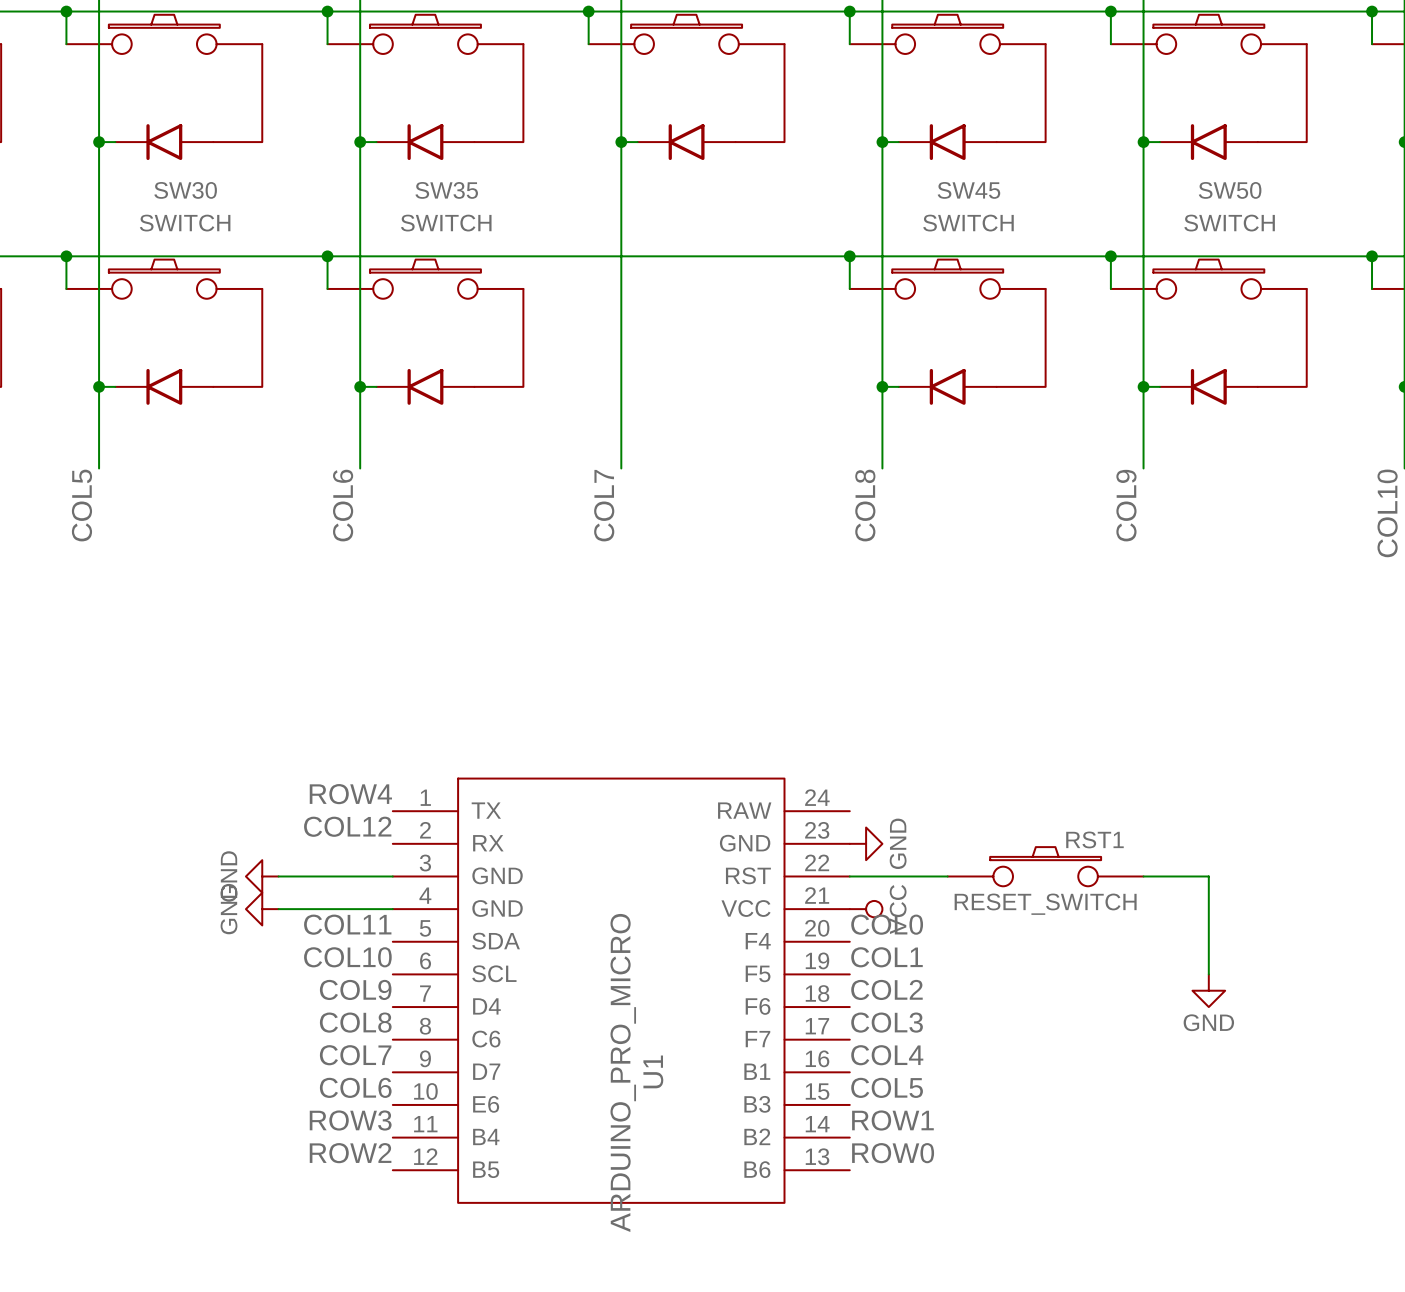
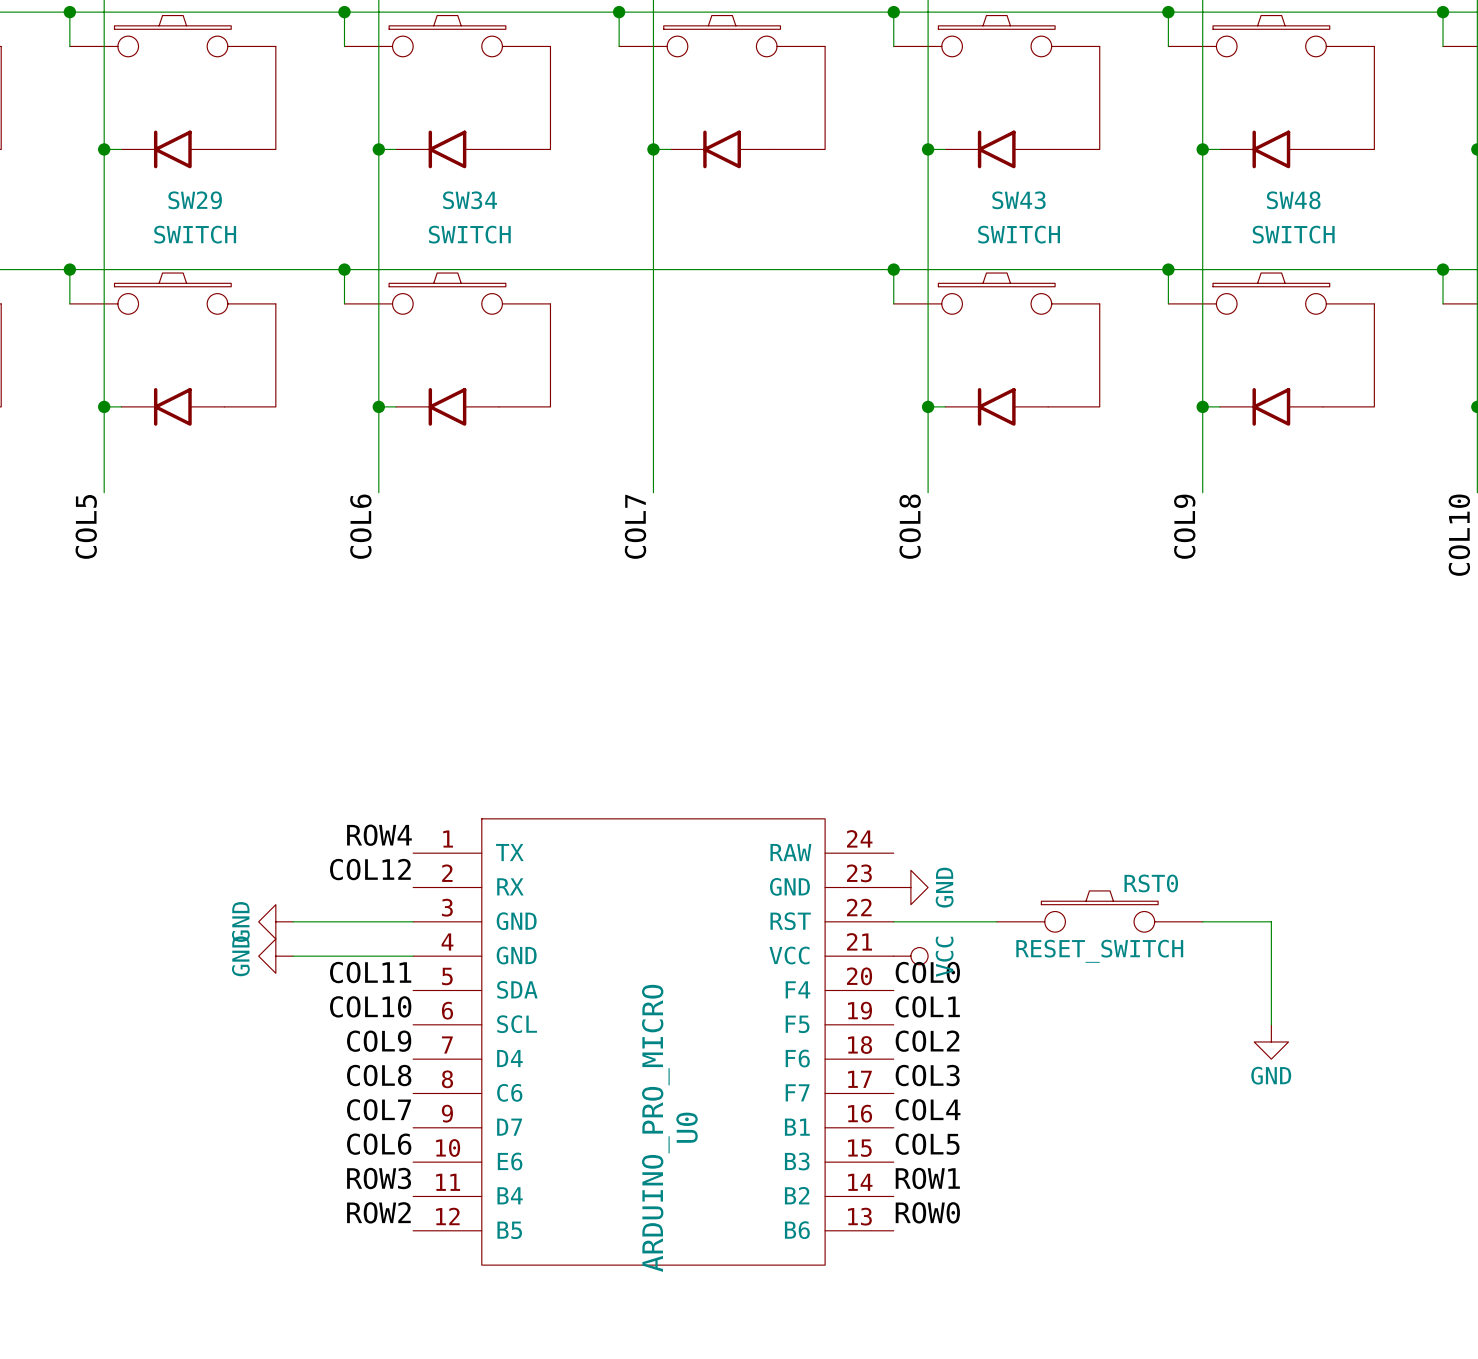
SW30 name: SW30 (185, 190) -> SW29 (195, 200)
SW35 name: SW35 (446, 190) -> SW34 (470, 200)
SW45 name: SW45 (968, 190) -> SW43 (1018, 200)
SW50 name: SW50 (1230, 190) -> SW48 (1293, 200)
RST1 name: RST1 (1094, 839) -> RST0 (1151, 883)
U1 name: U1 (653, 1071) -> U0 (687, 1127)

